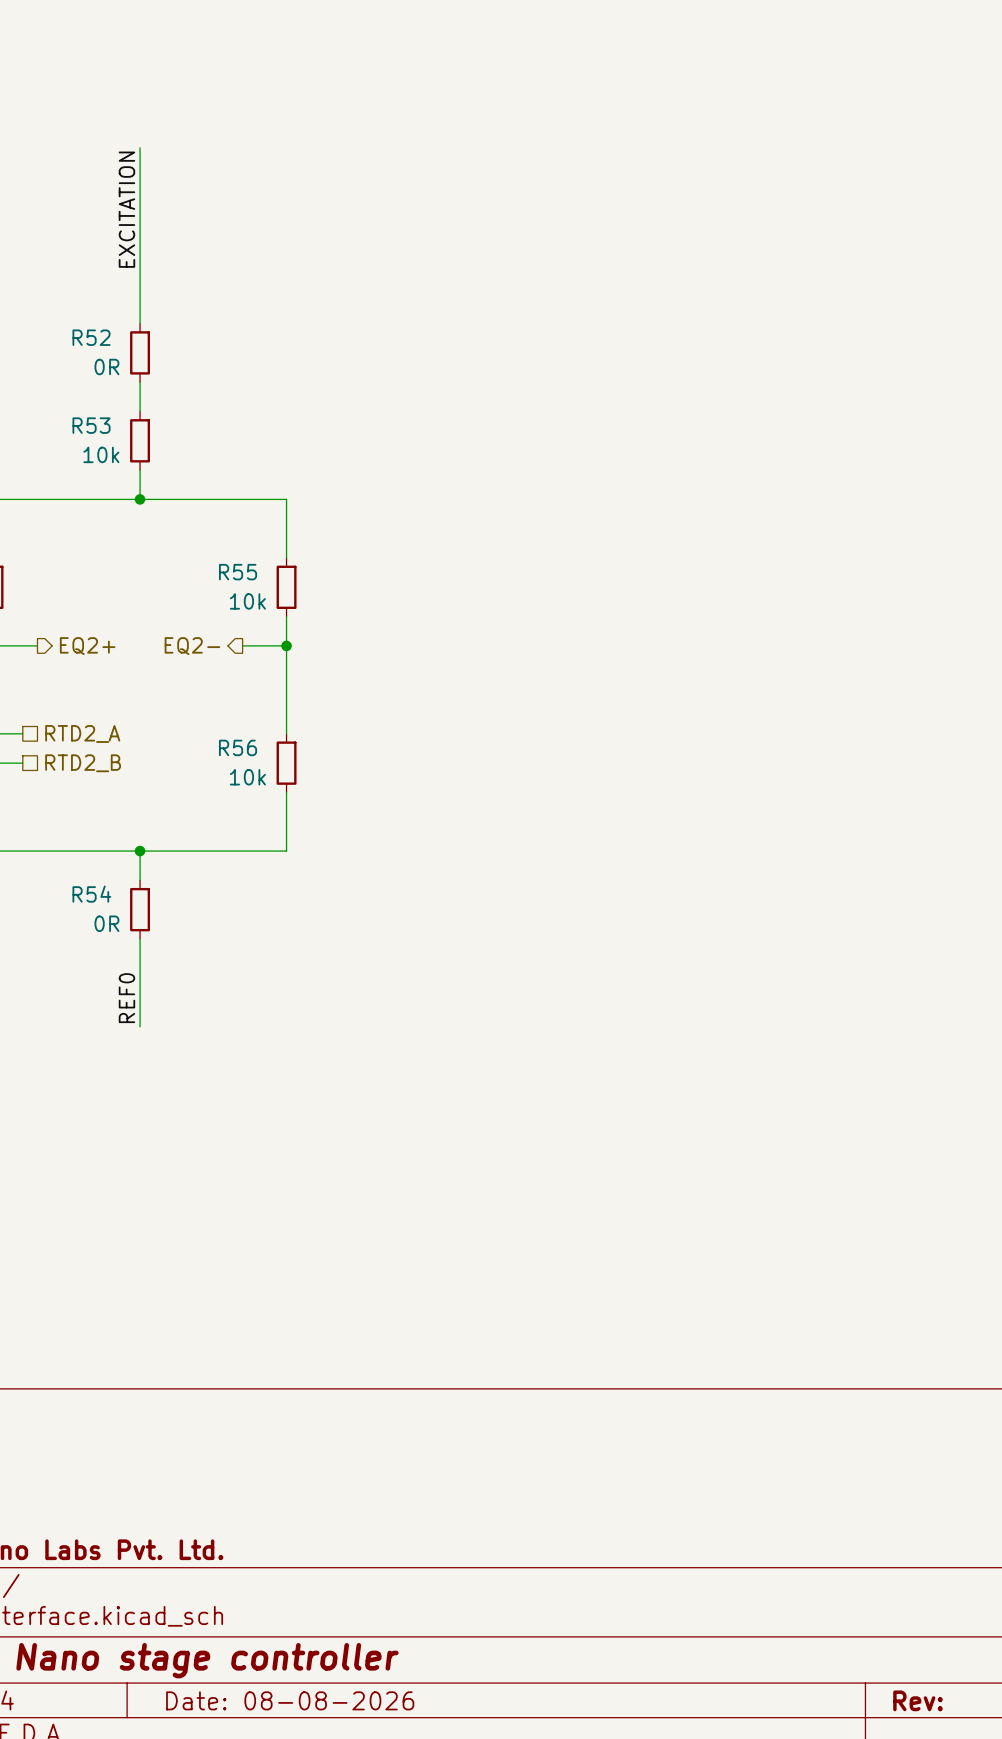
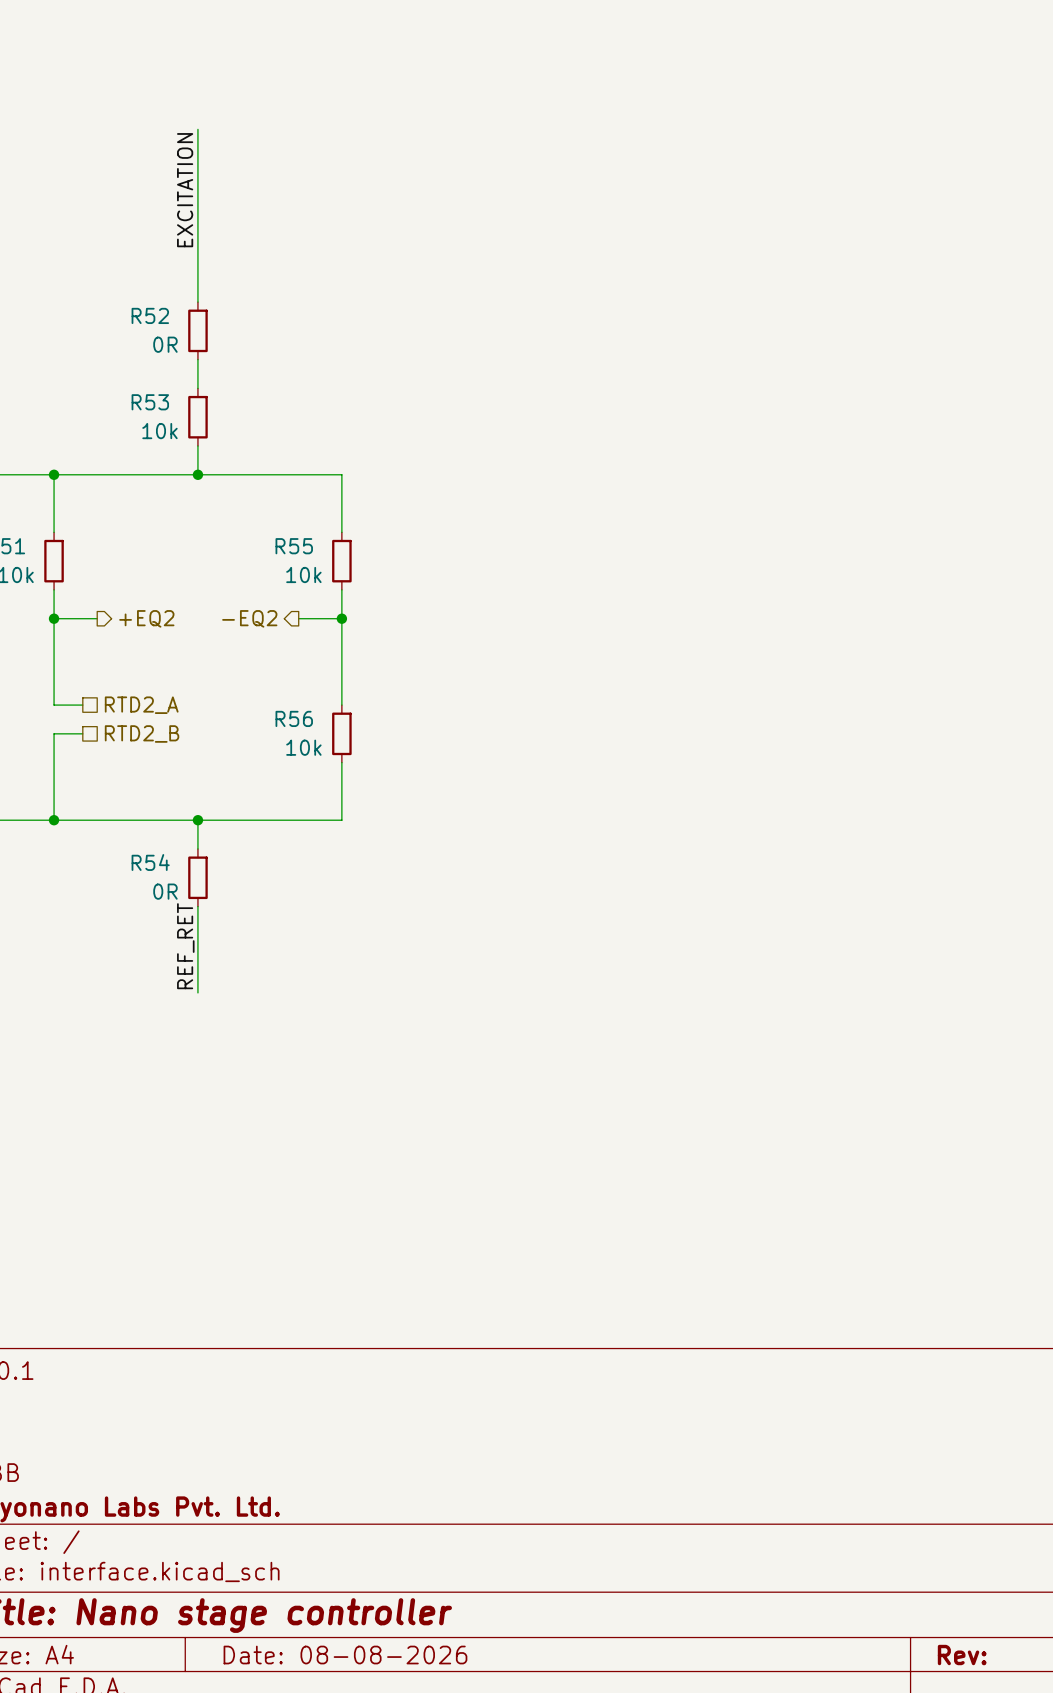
hierarchical label: EQ2+ (87, 646) -> +EQ2 (146, 618)
hierarchical label: EQ2- (192, 646) -> -EQ2 (249, 618)
label: REF0 (126, 998) -> REF_RET (185, 946)

